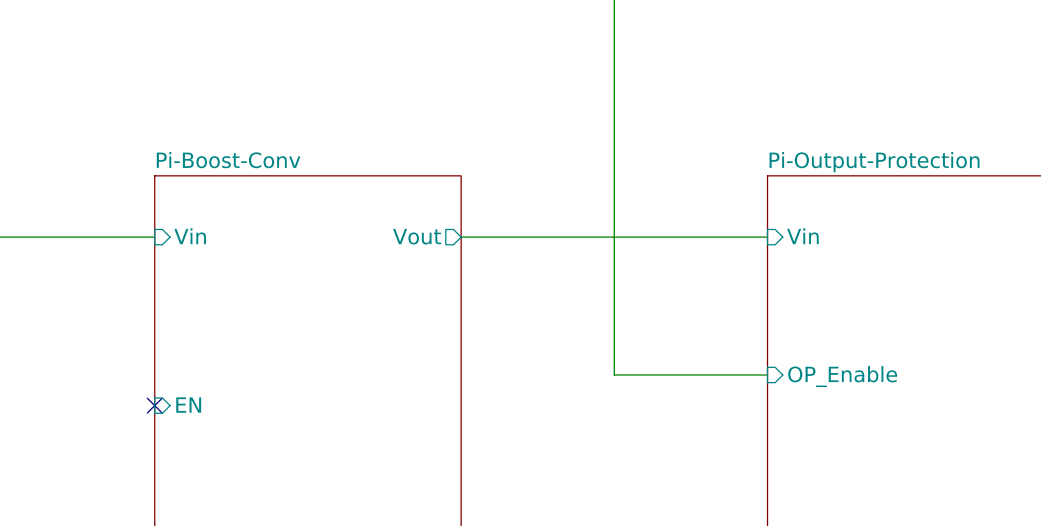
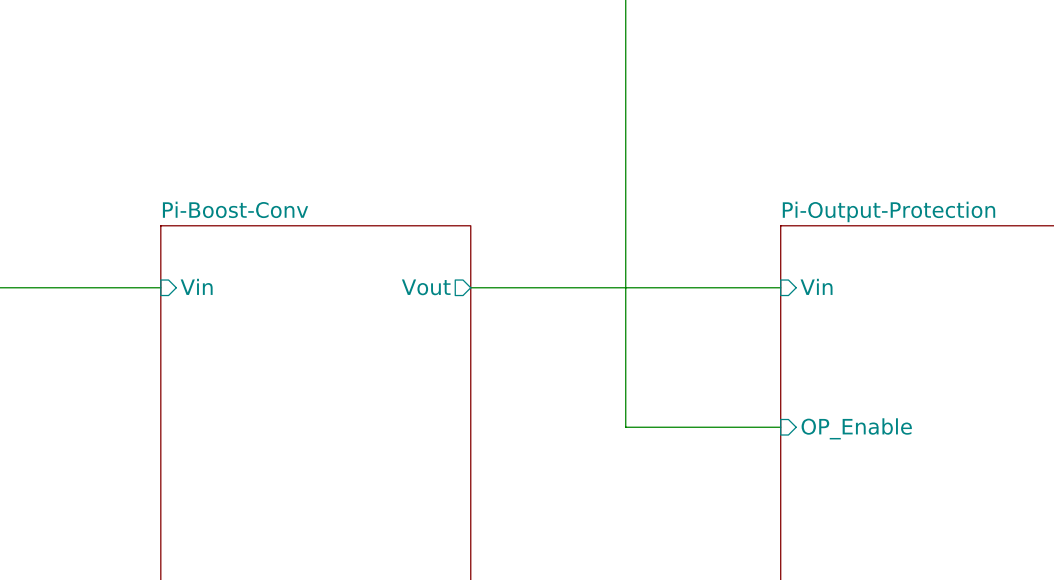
no-connect mark: (154, 405) -> none
sheet pin: EN (188, 405) -> none

